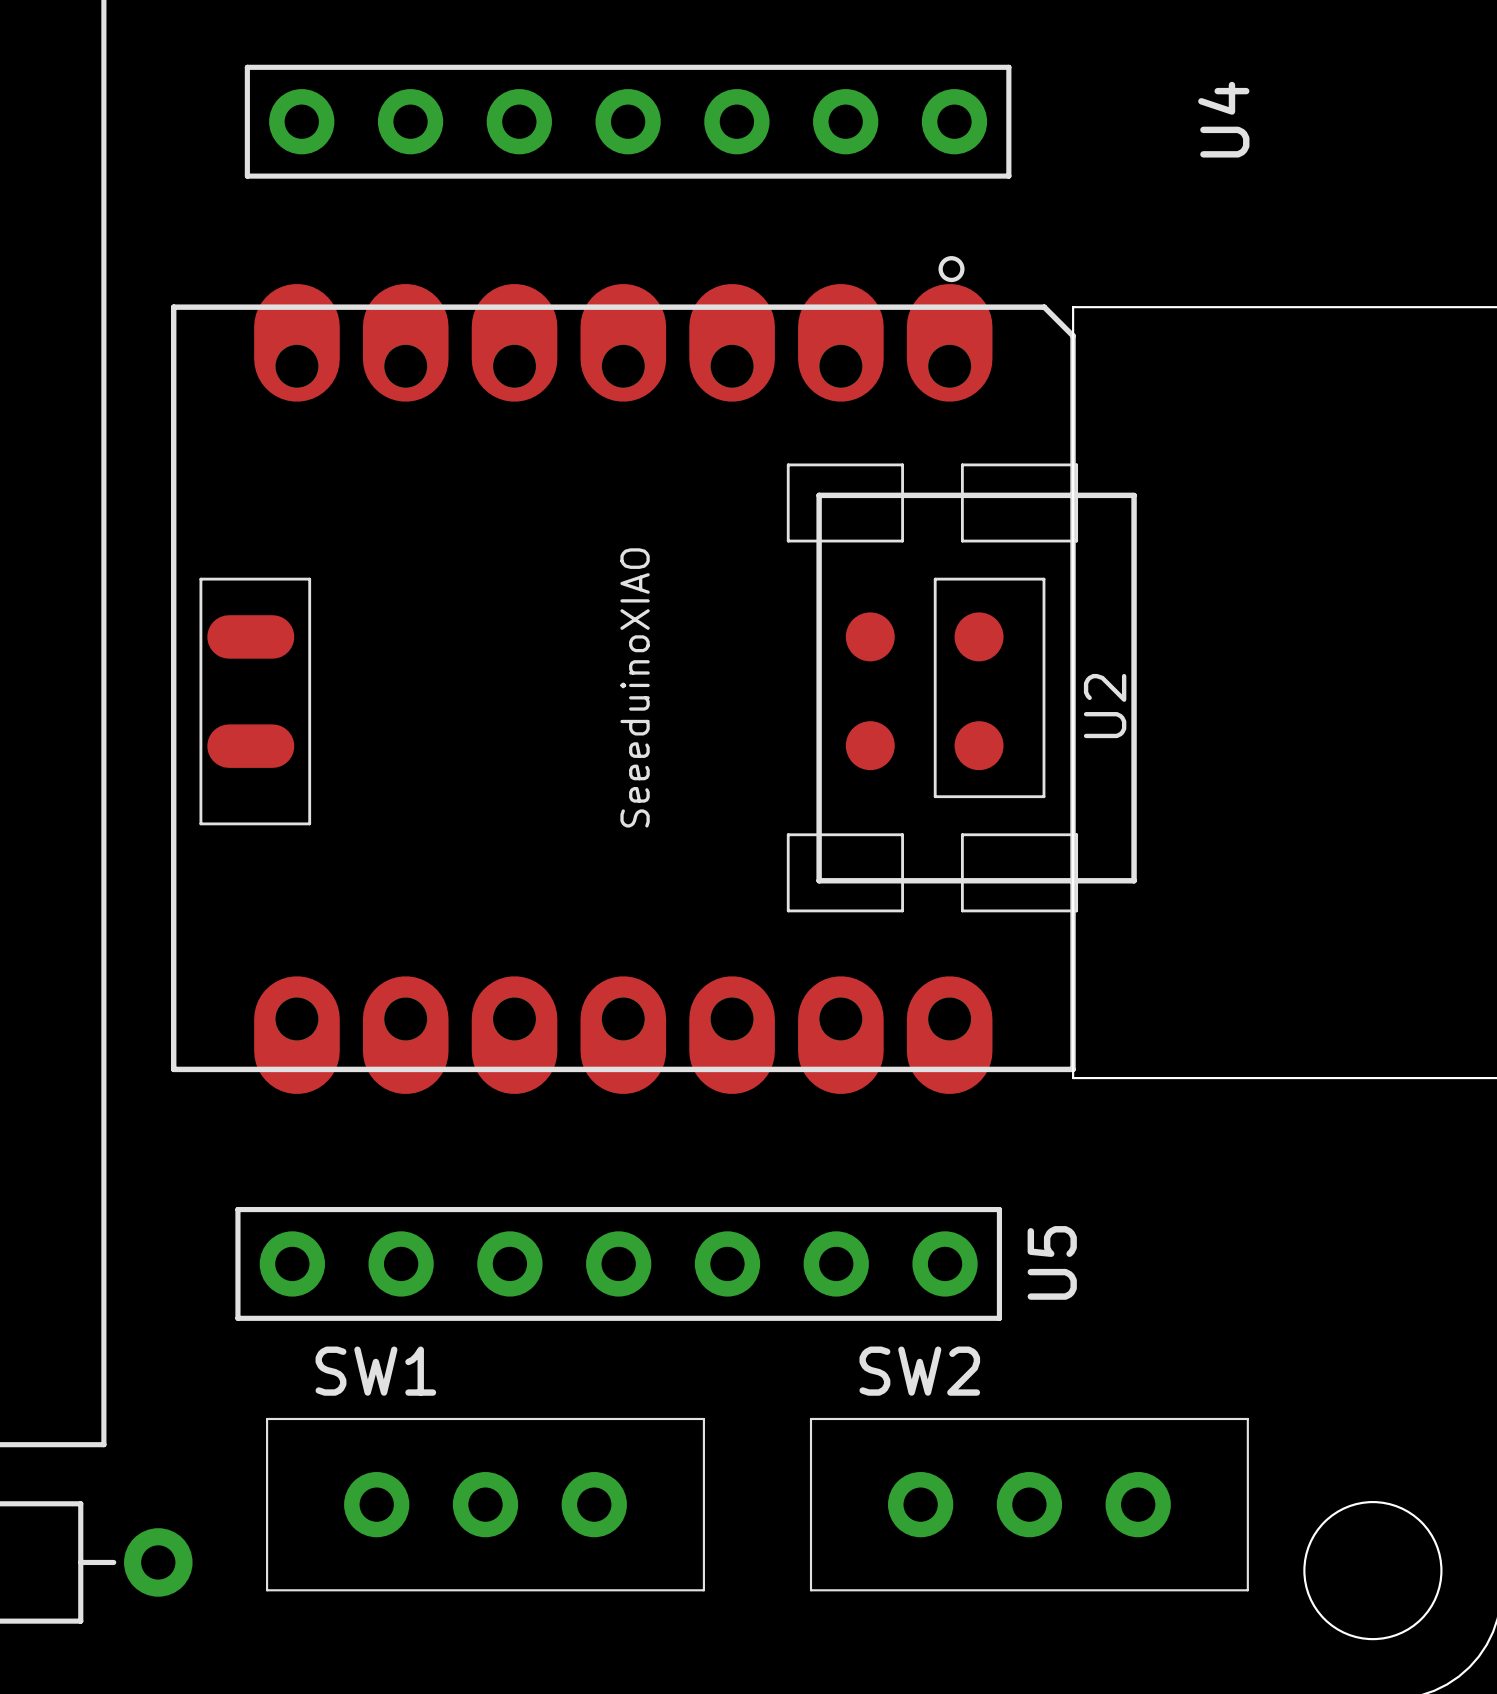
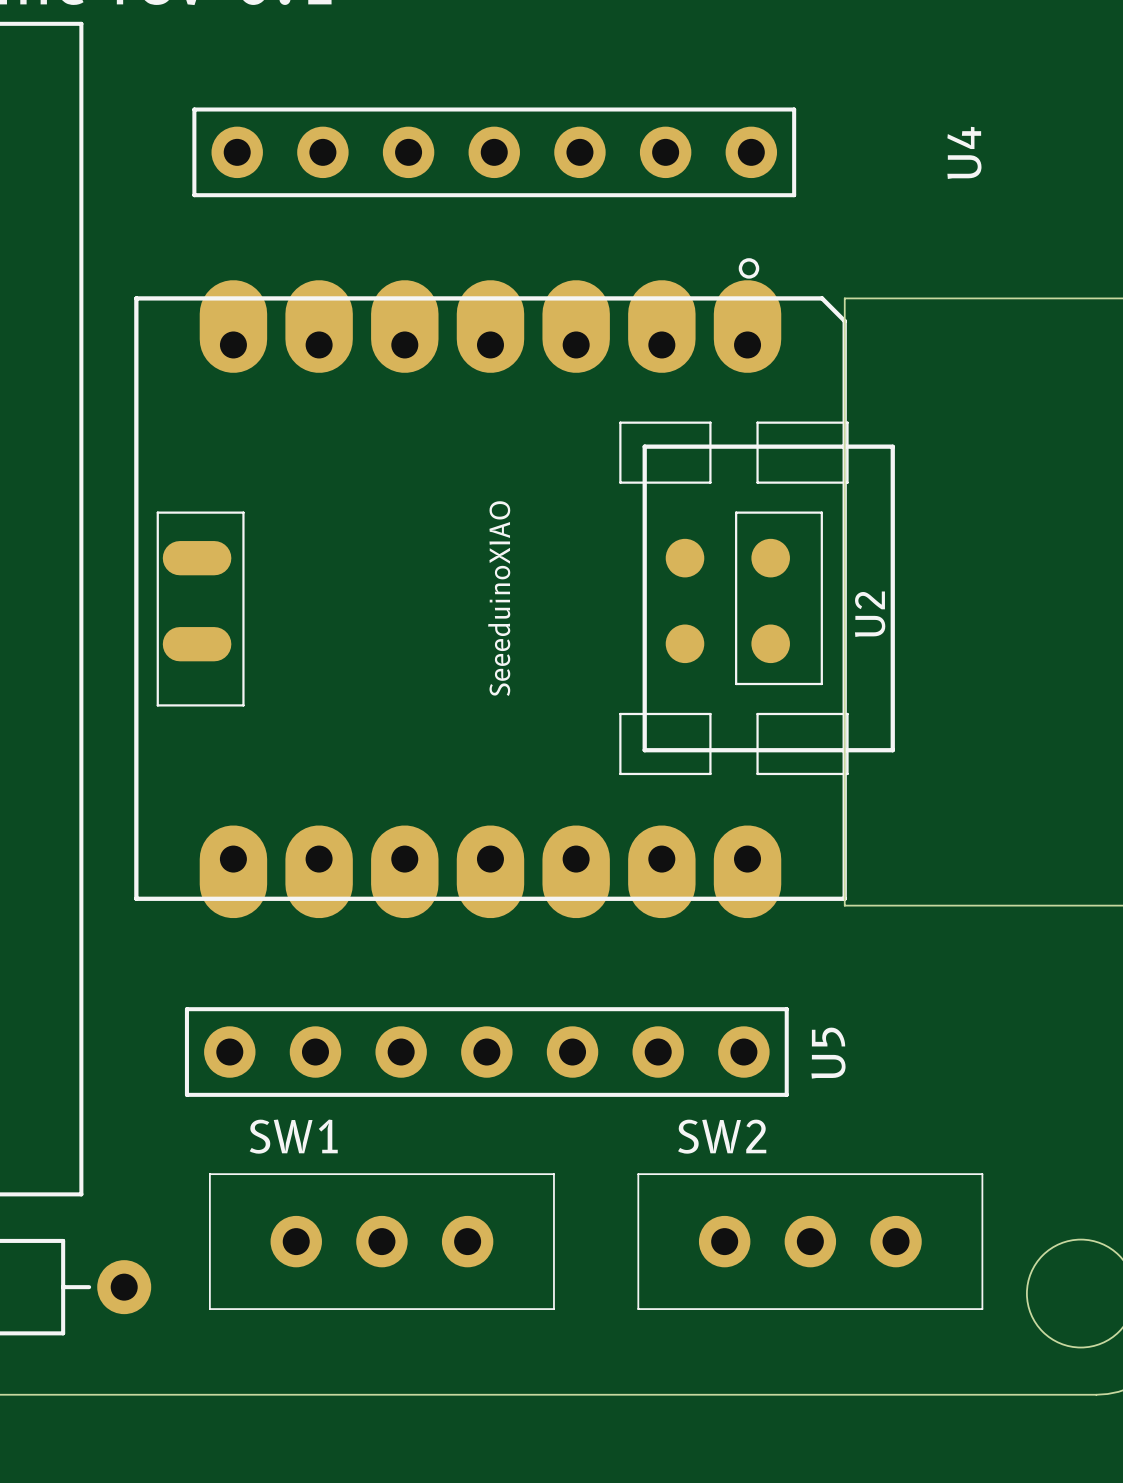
U2 footprint: [170, 256, 1137, 1094] -> [134, 258, 895, 919]

